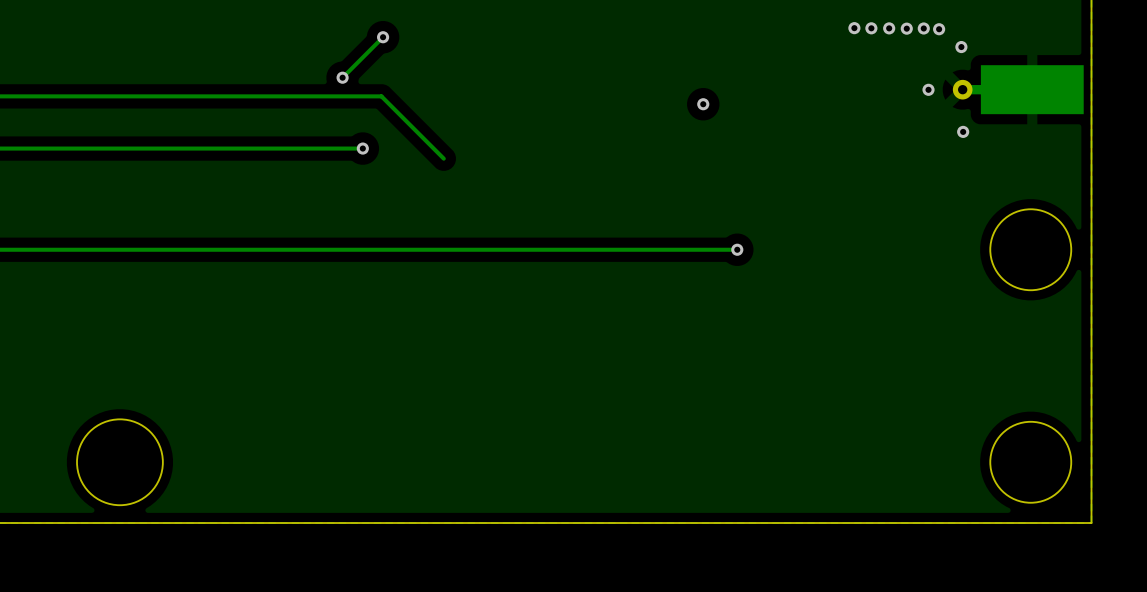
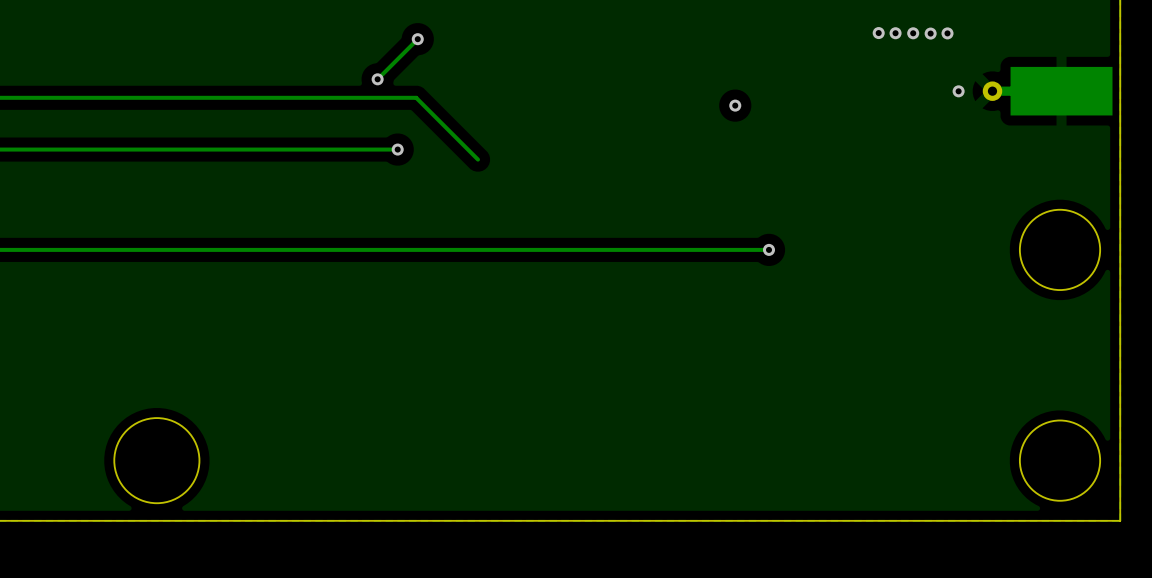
via: (854, 28) -> none
via: (871, 28) -> none
via: (889, 28) -> none
via: (906, 28) -> none
via: (923, 28) -> none
via: (939, 29) -> none
via: none -> (878, 33)
via: none -> (895, 33)
via: none -> (913, 33)
via: none -> (930, 33)
via: none -> (947, 33)
via: (961, 47) -> none
via: (963, 131) -> none

